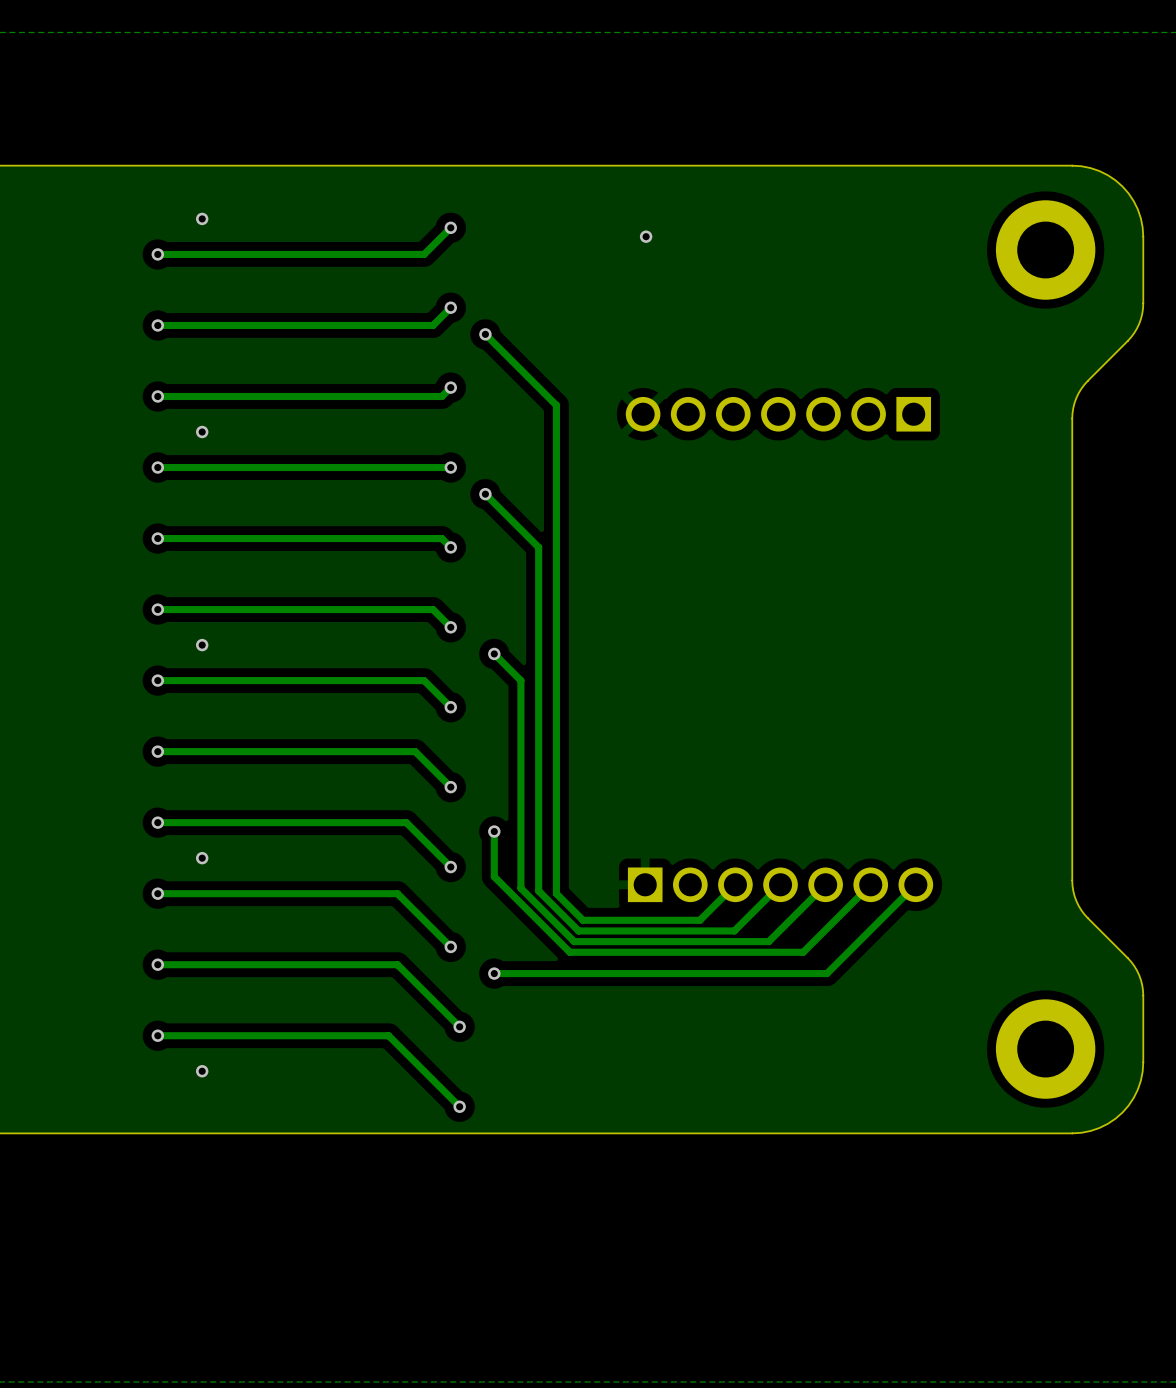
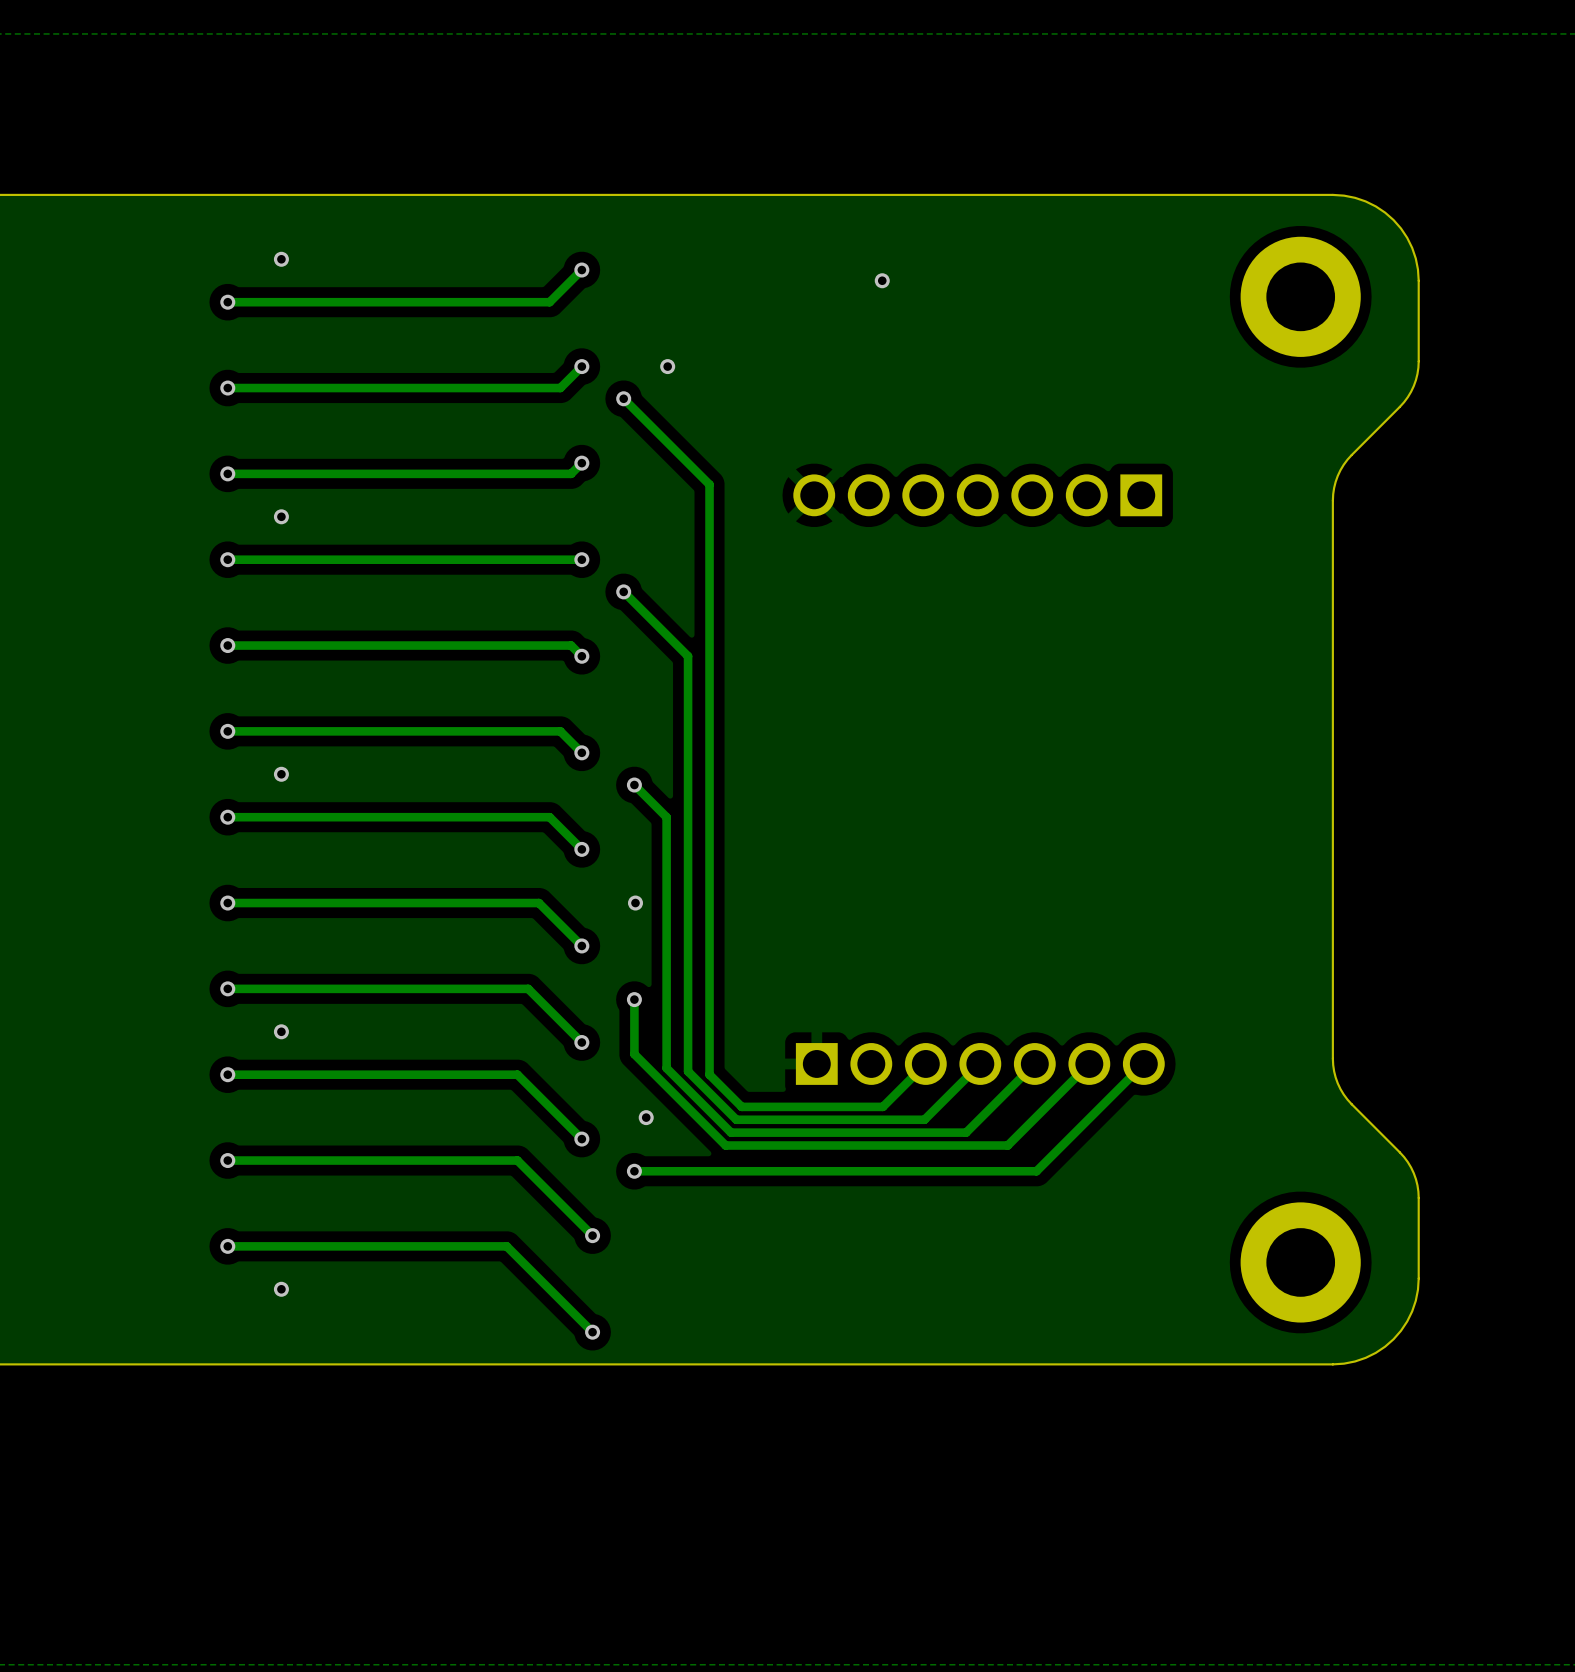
via position: (646, 236) -> (882, 280)
via: none -> (667, 366)
via: none -> (635, 903)
via: none -> (646, 1117)

